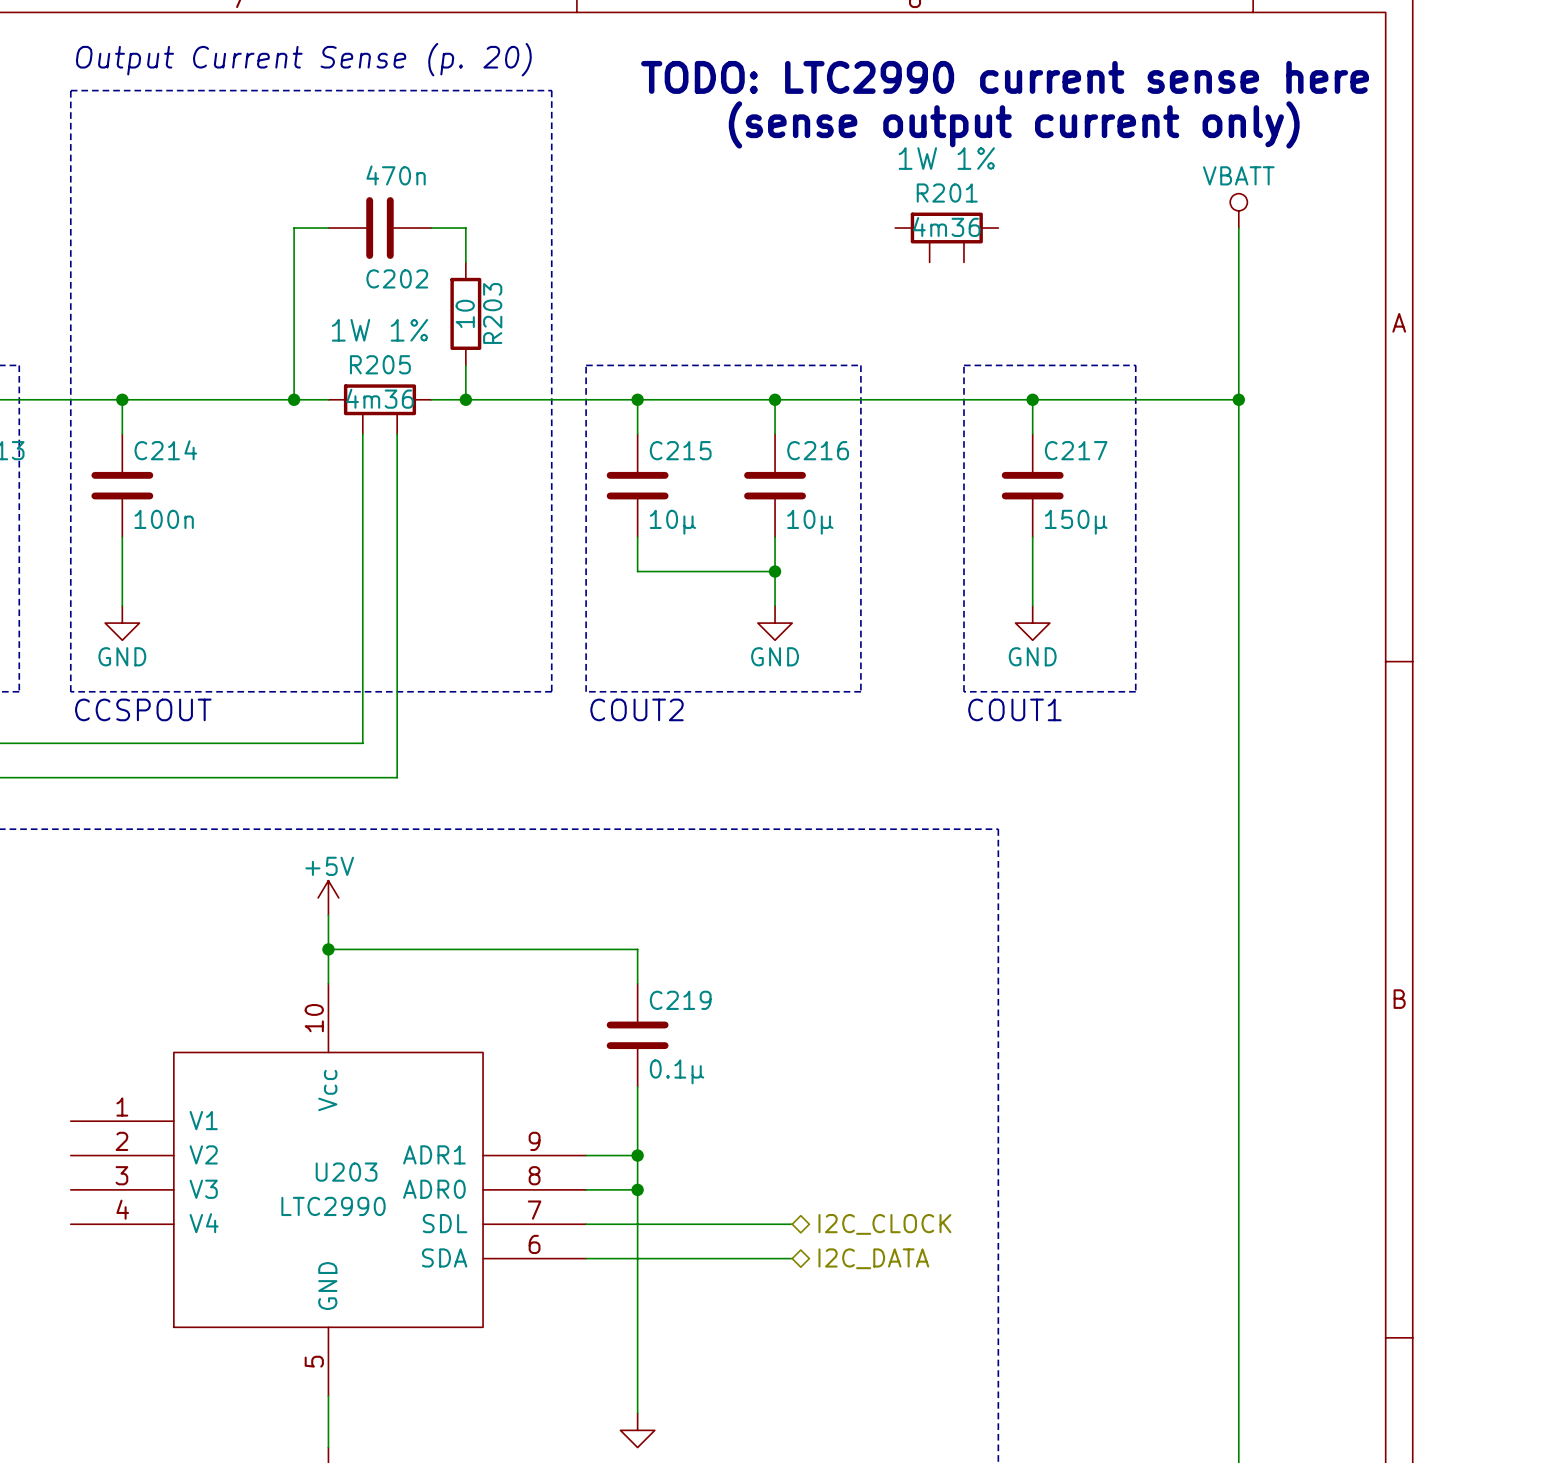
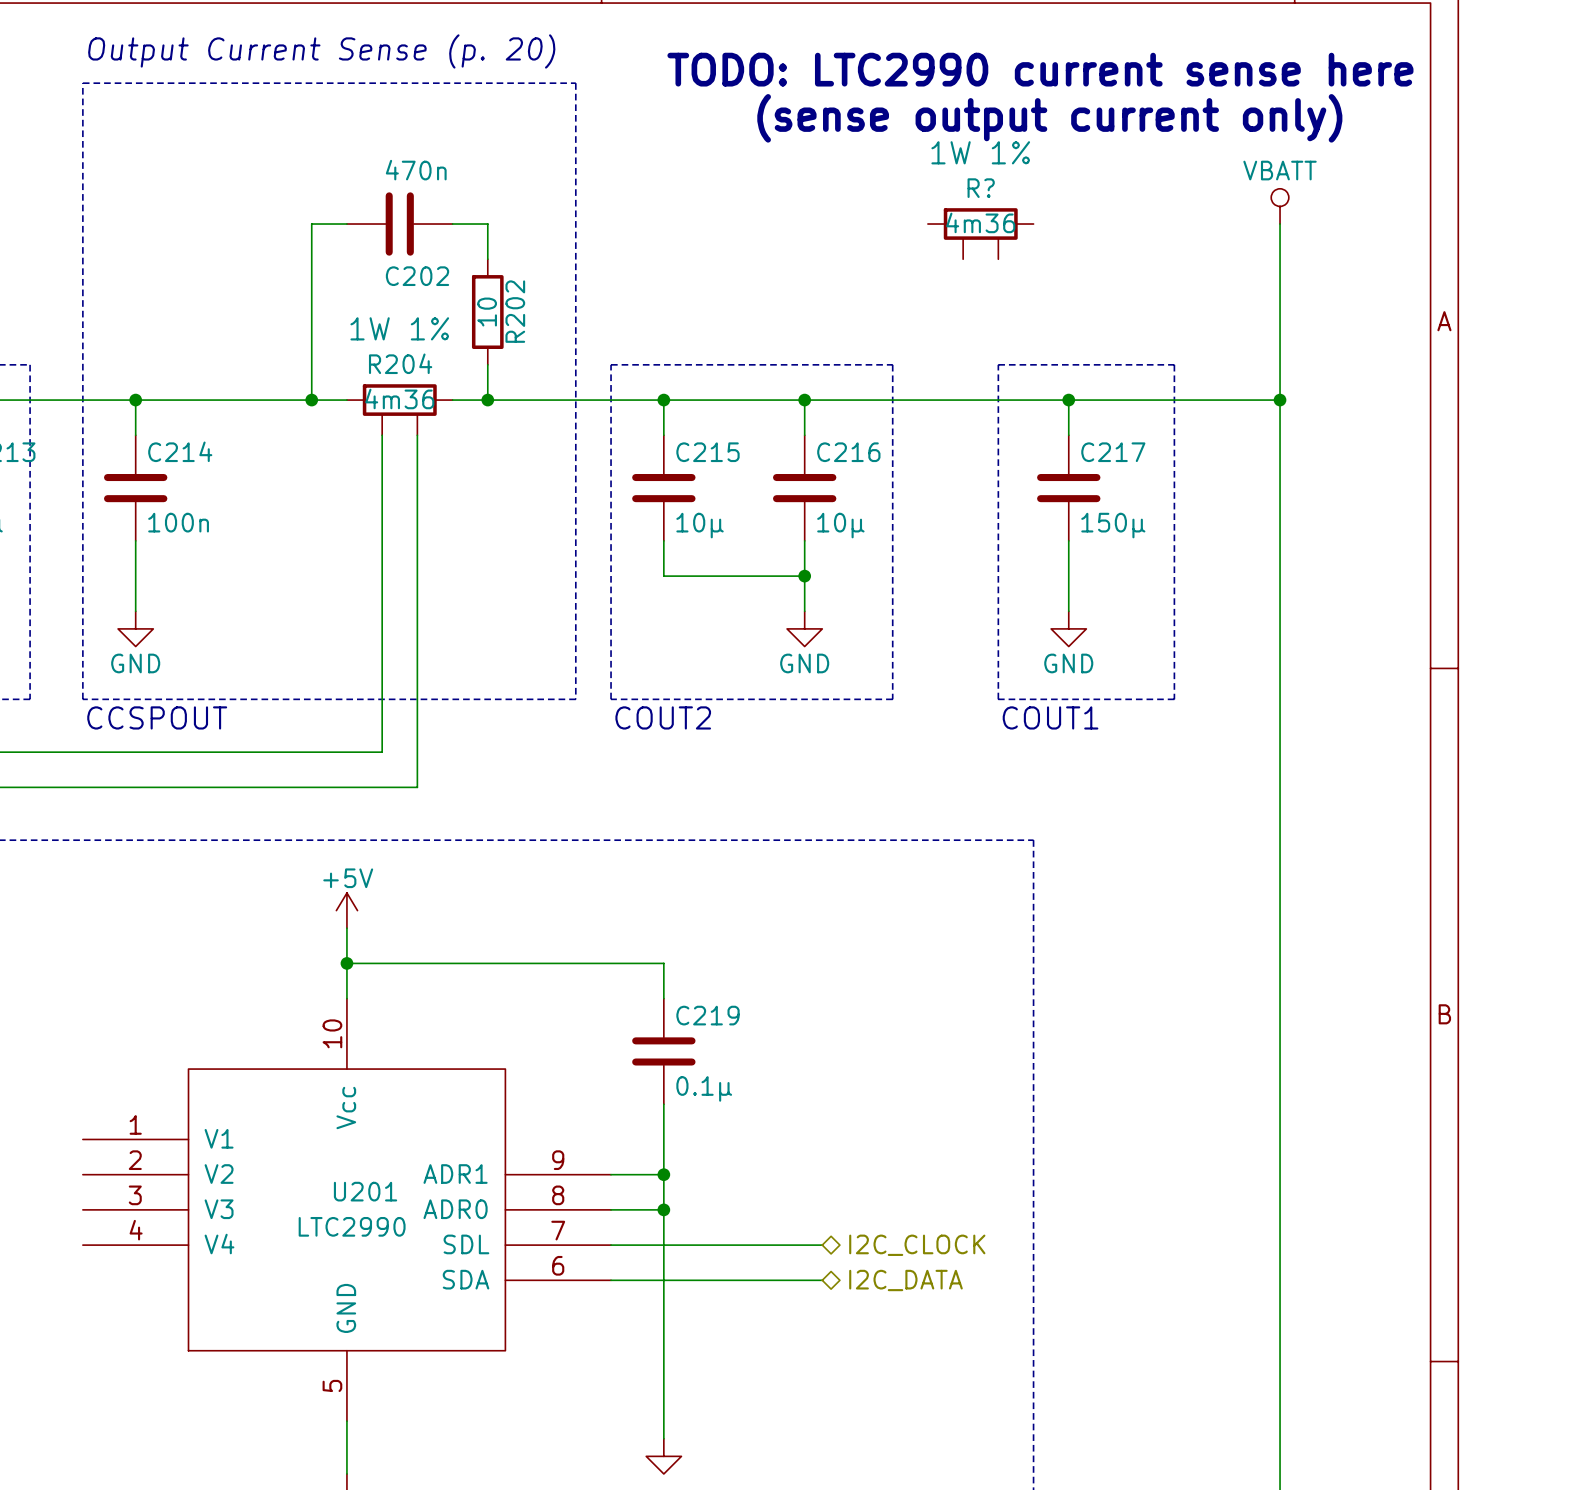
R201 name: R201 (947, 193) -> R? (981, 188)
R203 name: R203 (492, 313) -> R202 (515, 311)
R205 name: R205 (380, 364) -> R204 (400, 363)
U203 name: U203 (346, 1172) -> U201 (365, 1191)

